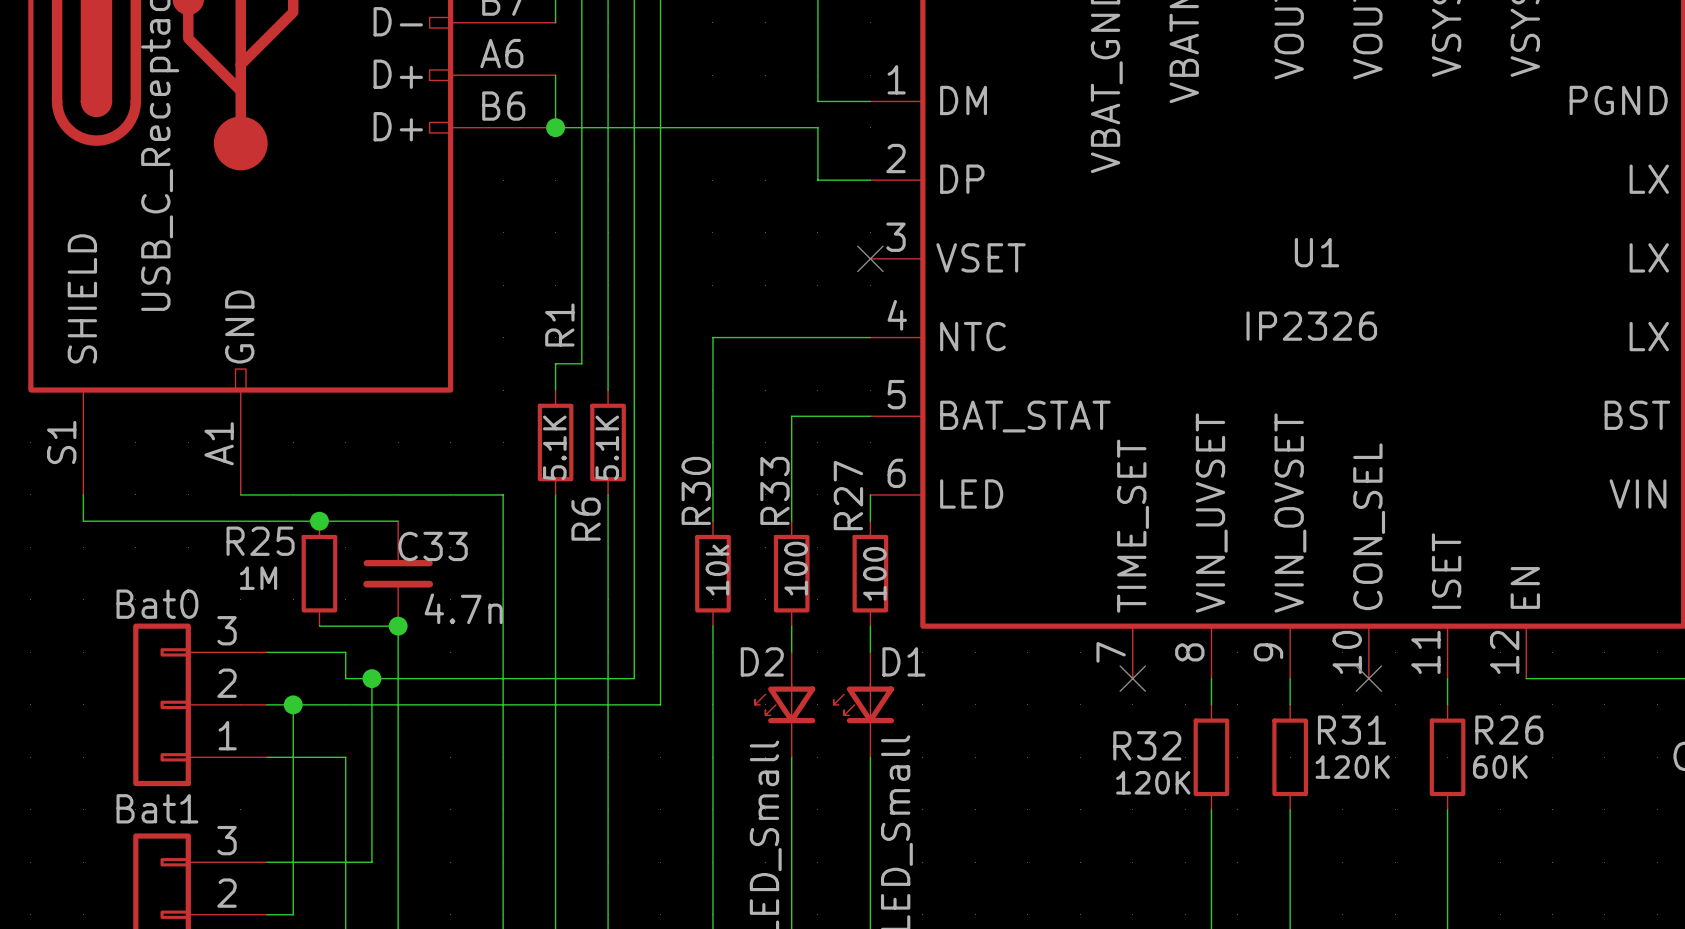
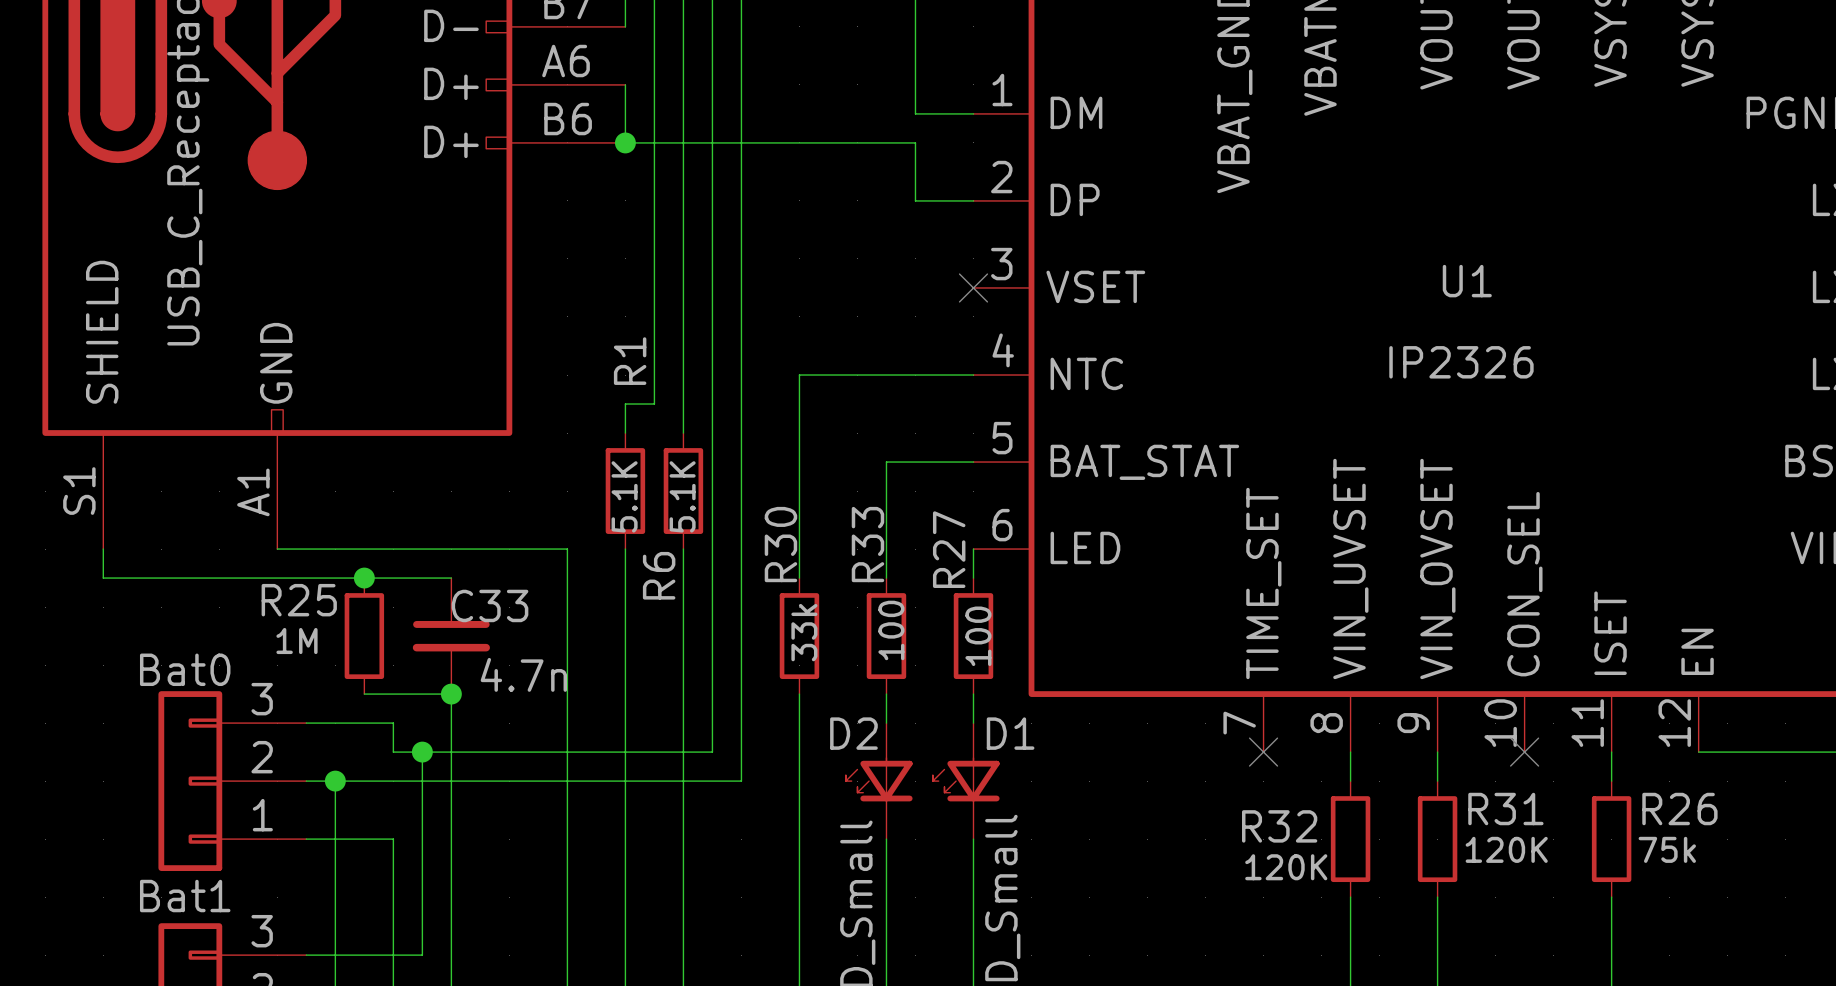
R30 value: 10k (717, 570) -> 33k (804, 632)
R26 value: 60K (1500, 767) -> 75k (1667, 849)

